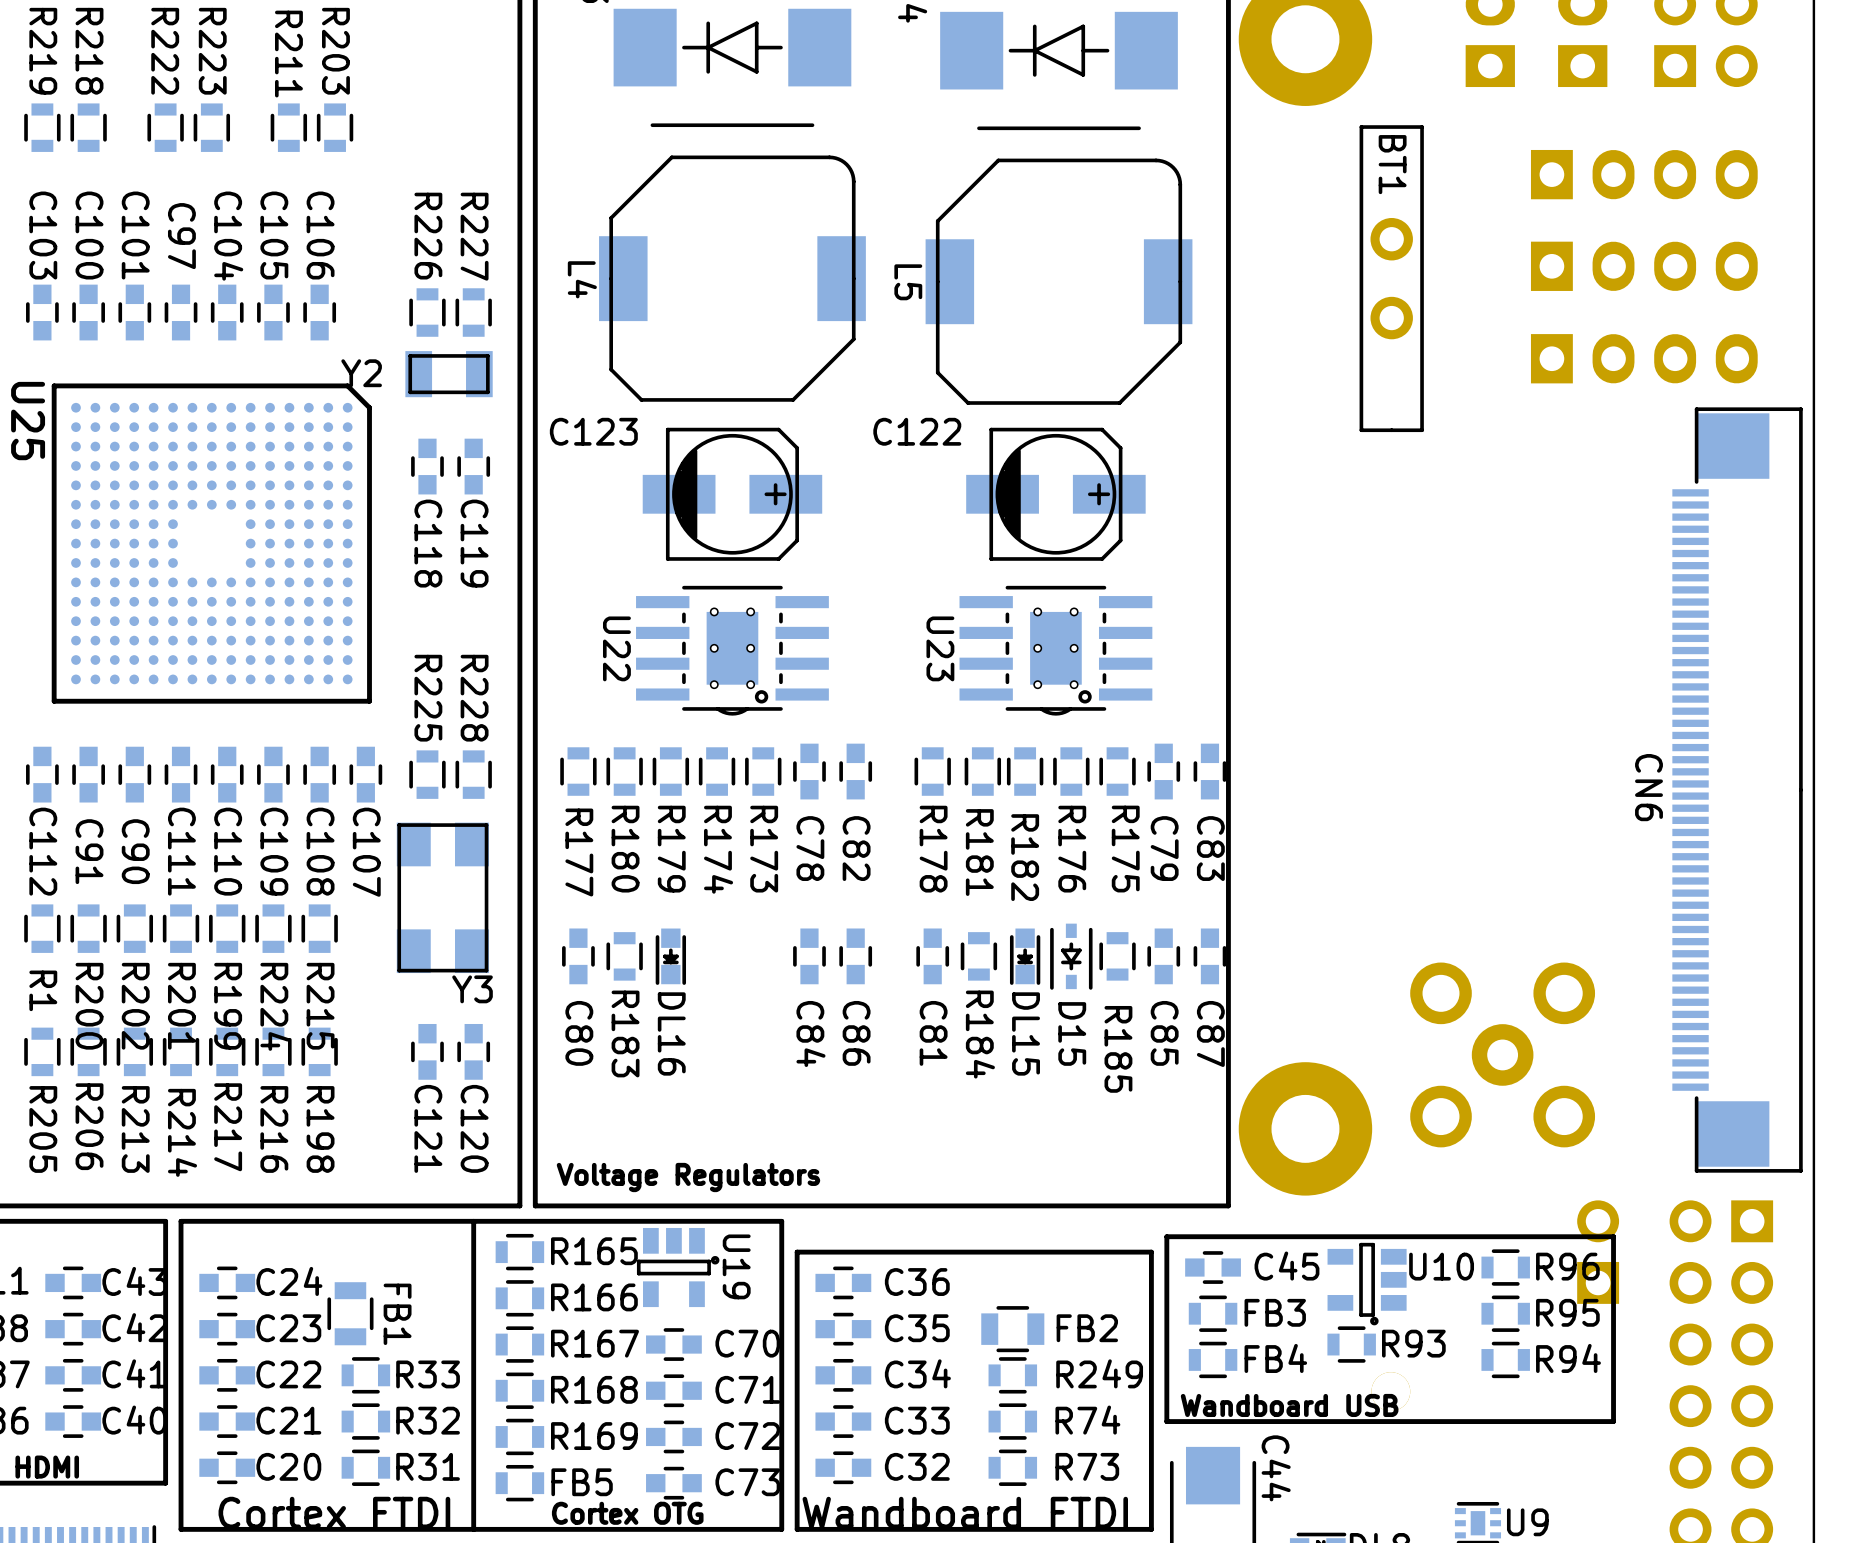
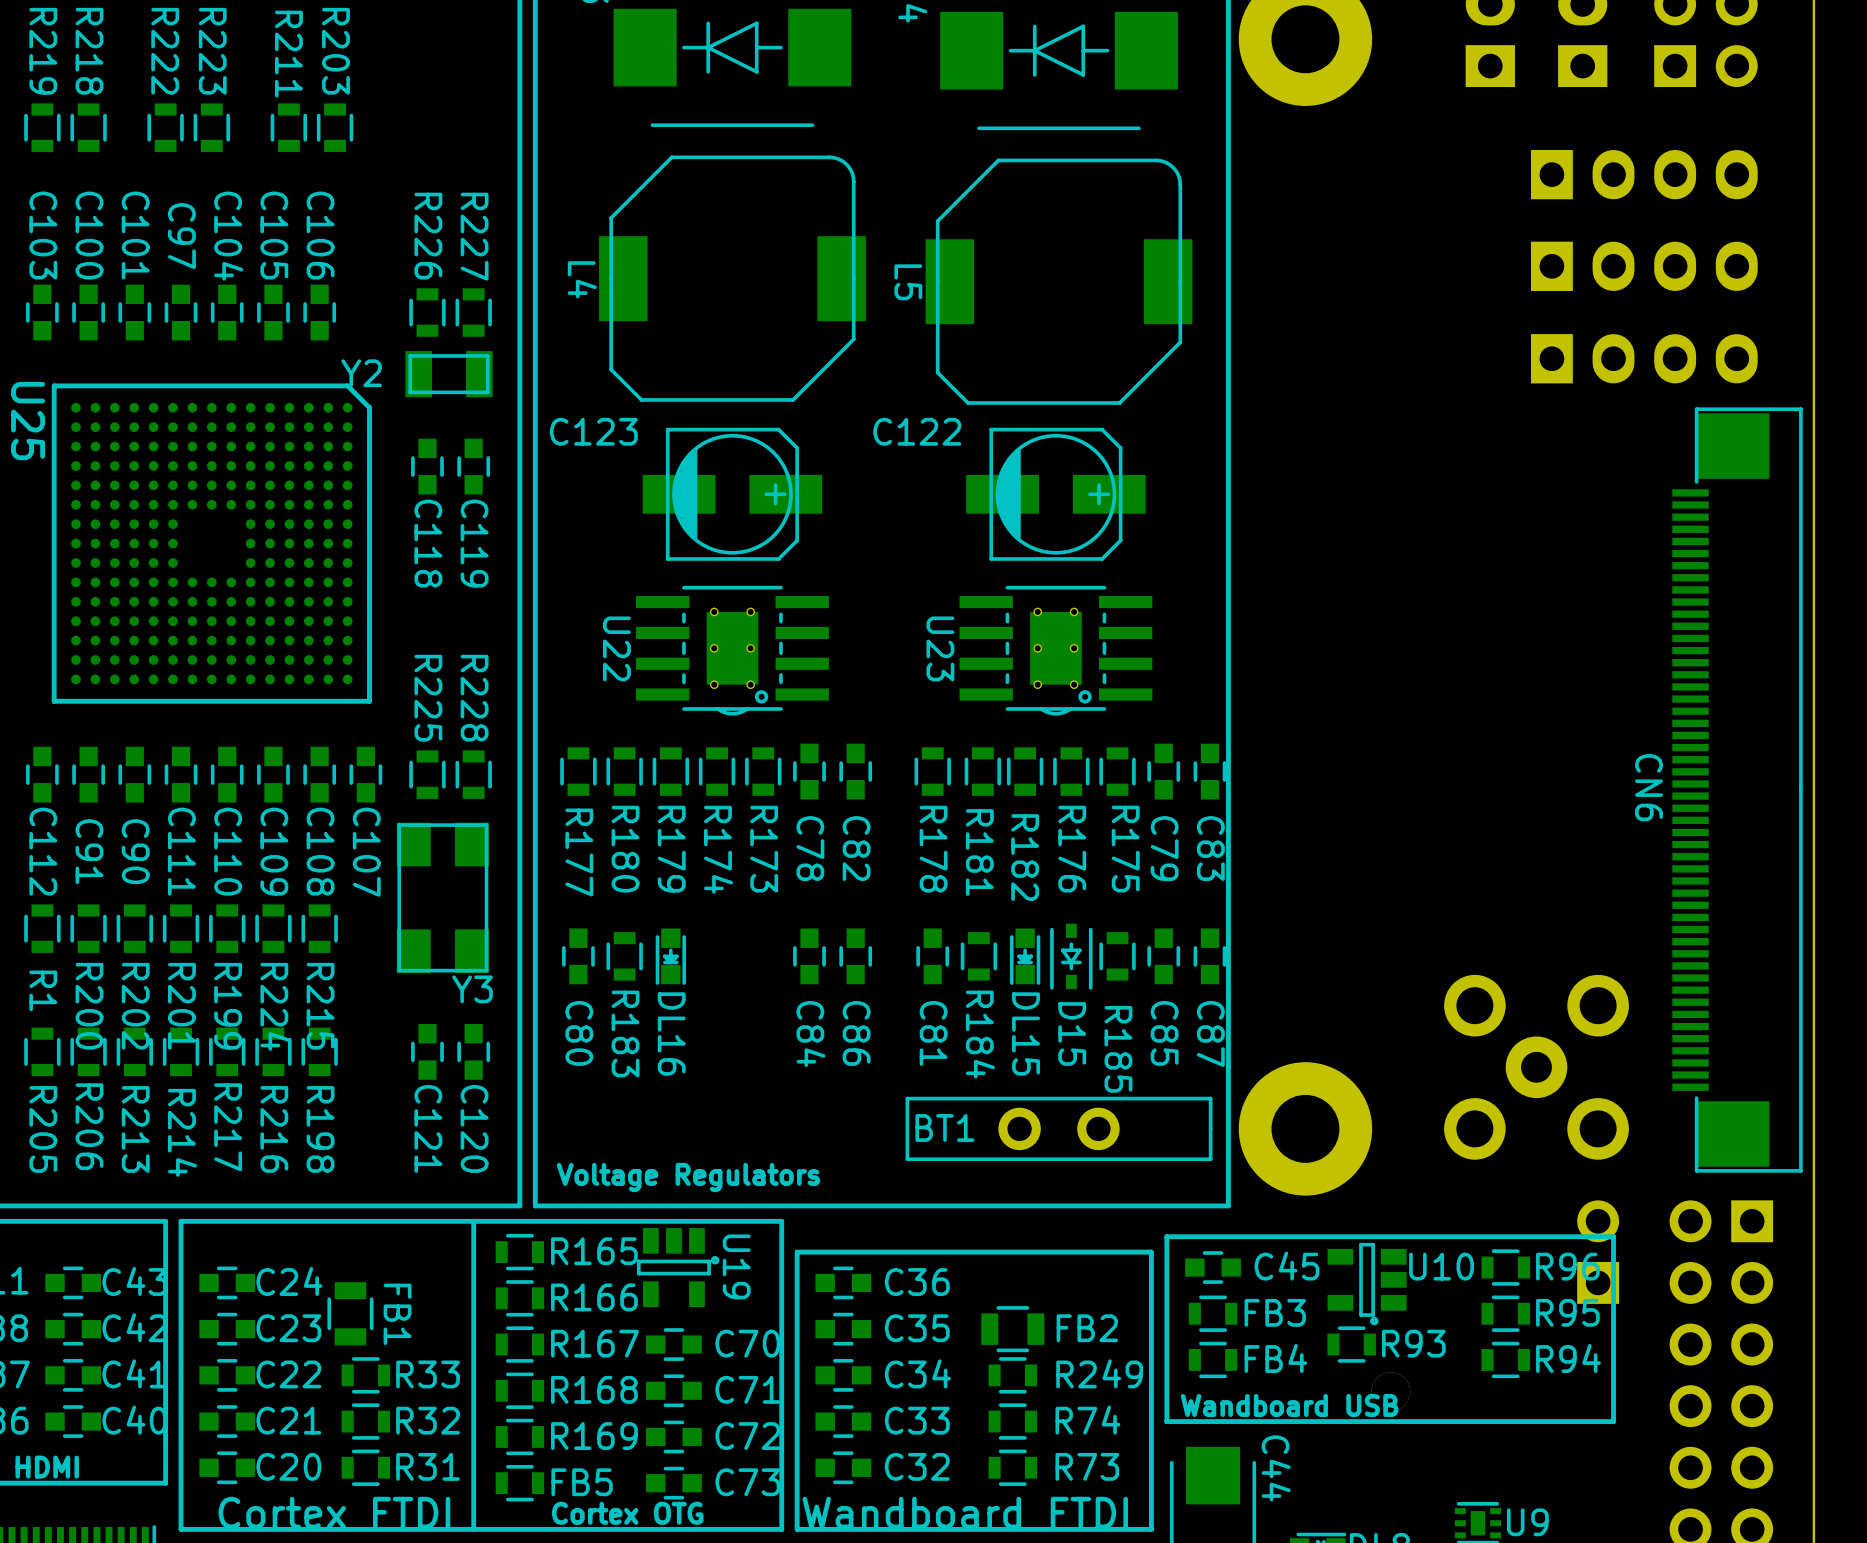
BT1 rotation: 0° (1391, 278) -> 90° counterclockwise (1059, 1128)
BT1 position: (1391, 278) -> (1059, 1128)
part position: (1502, 1054) -> (1536, 1067)

